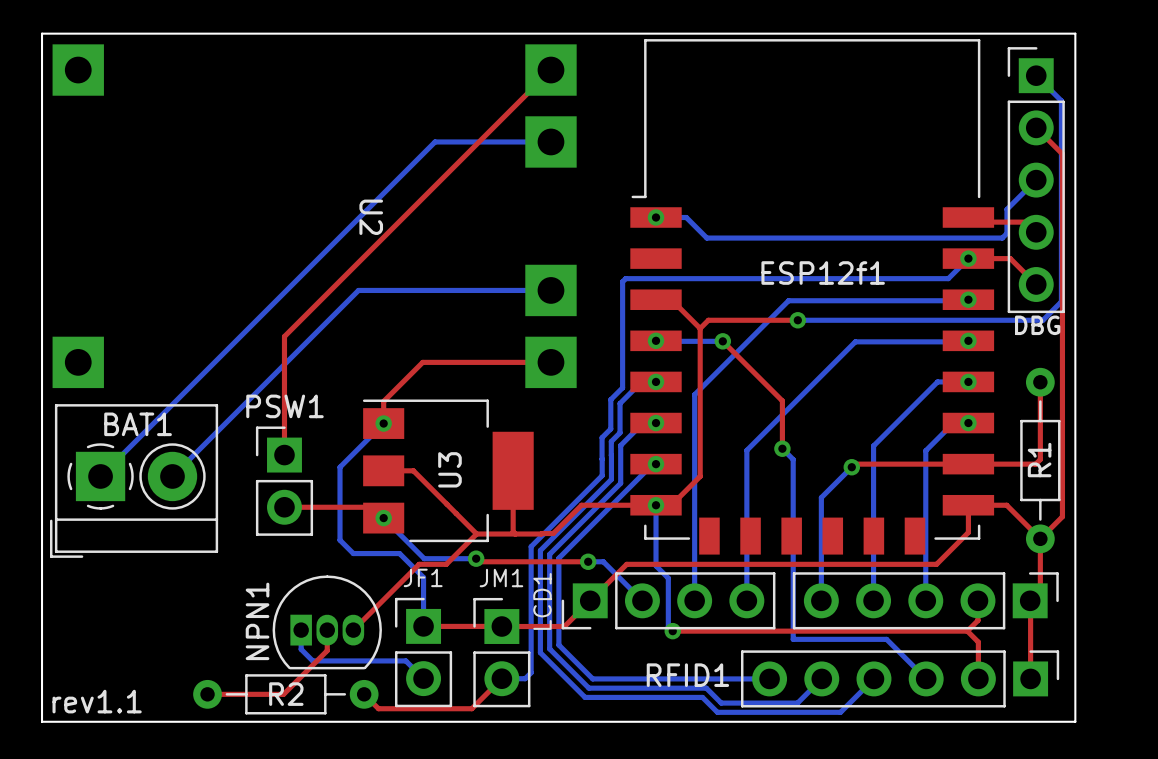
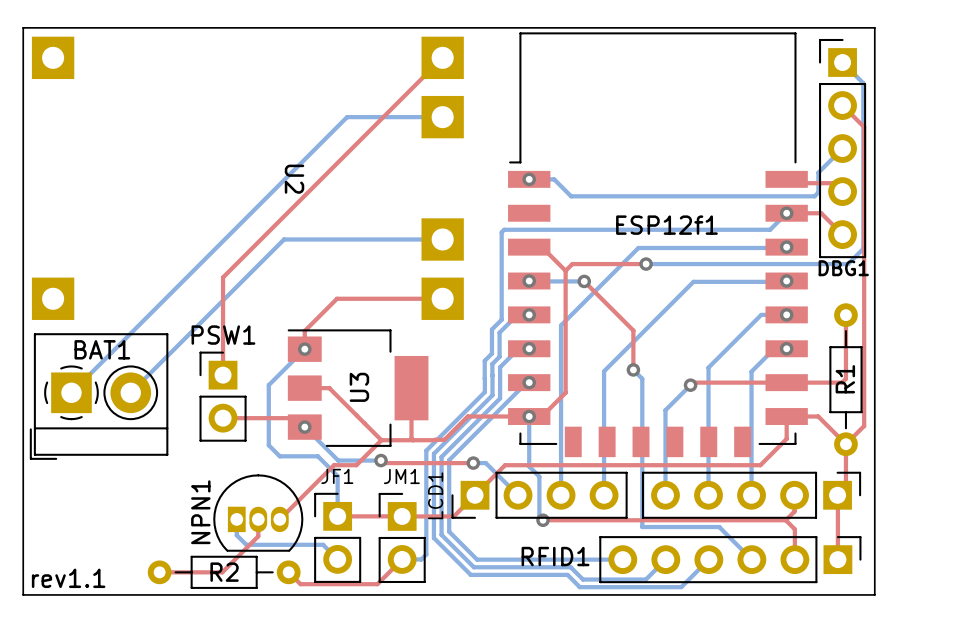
text: DBG (1037, 325) -> DBG1 (843, 268)

